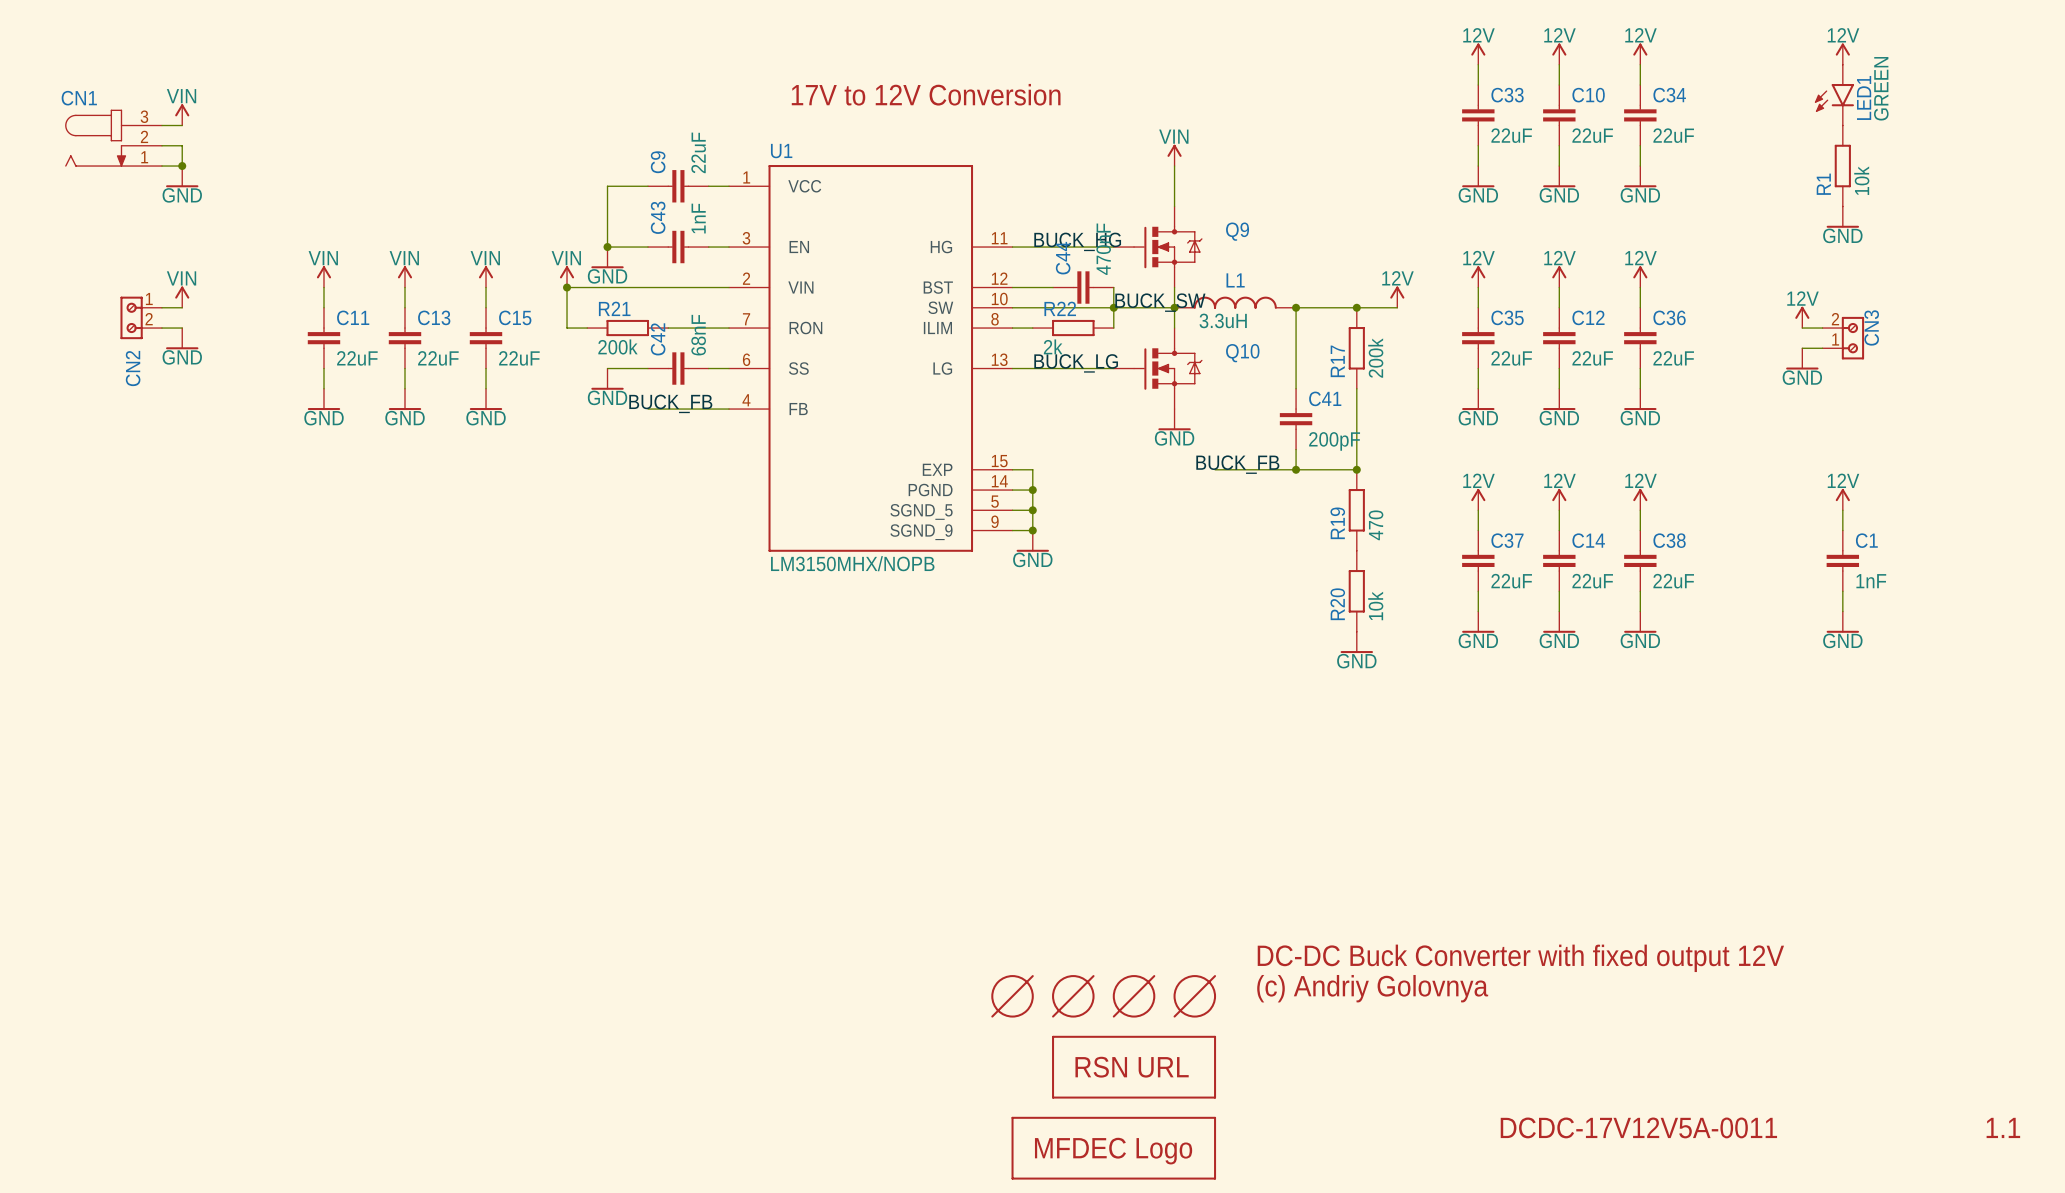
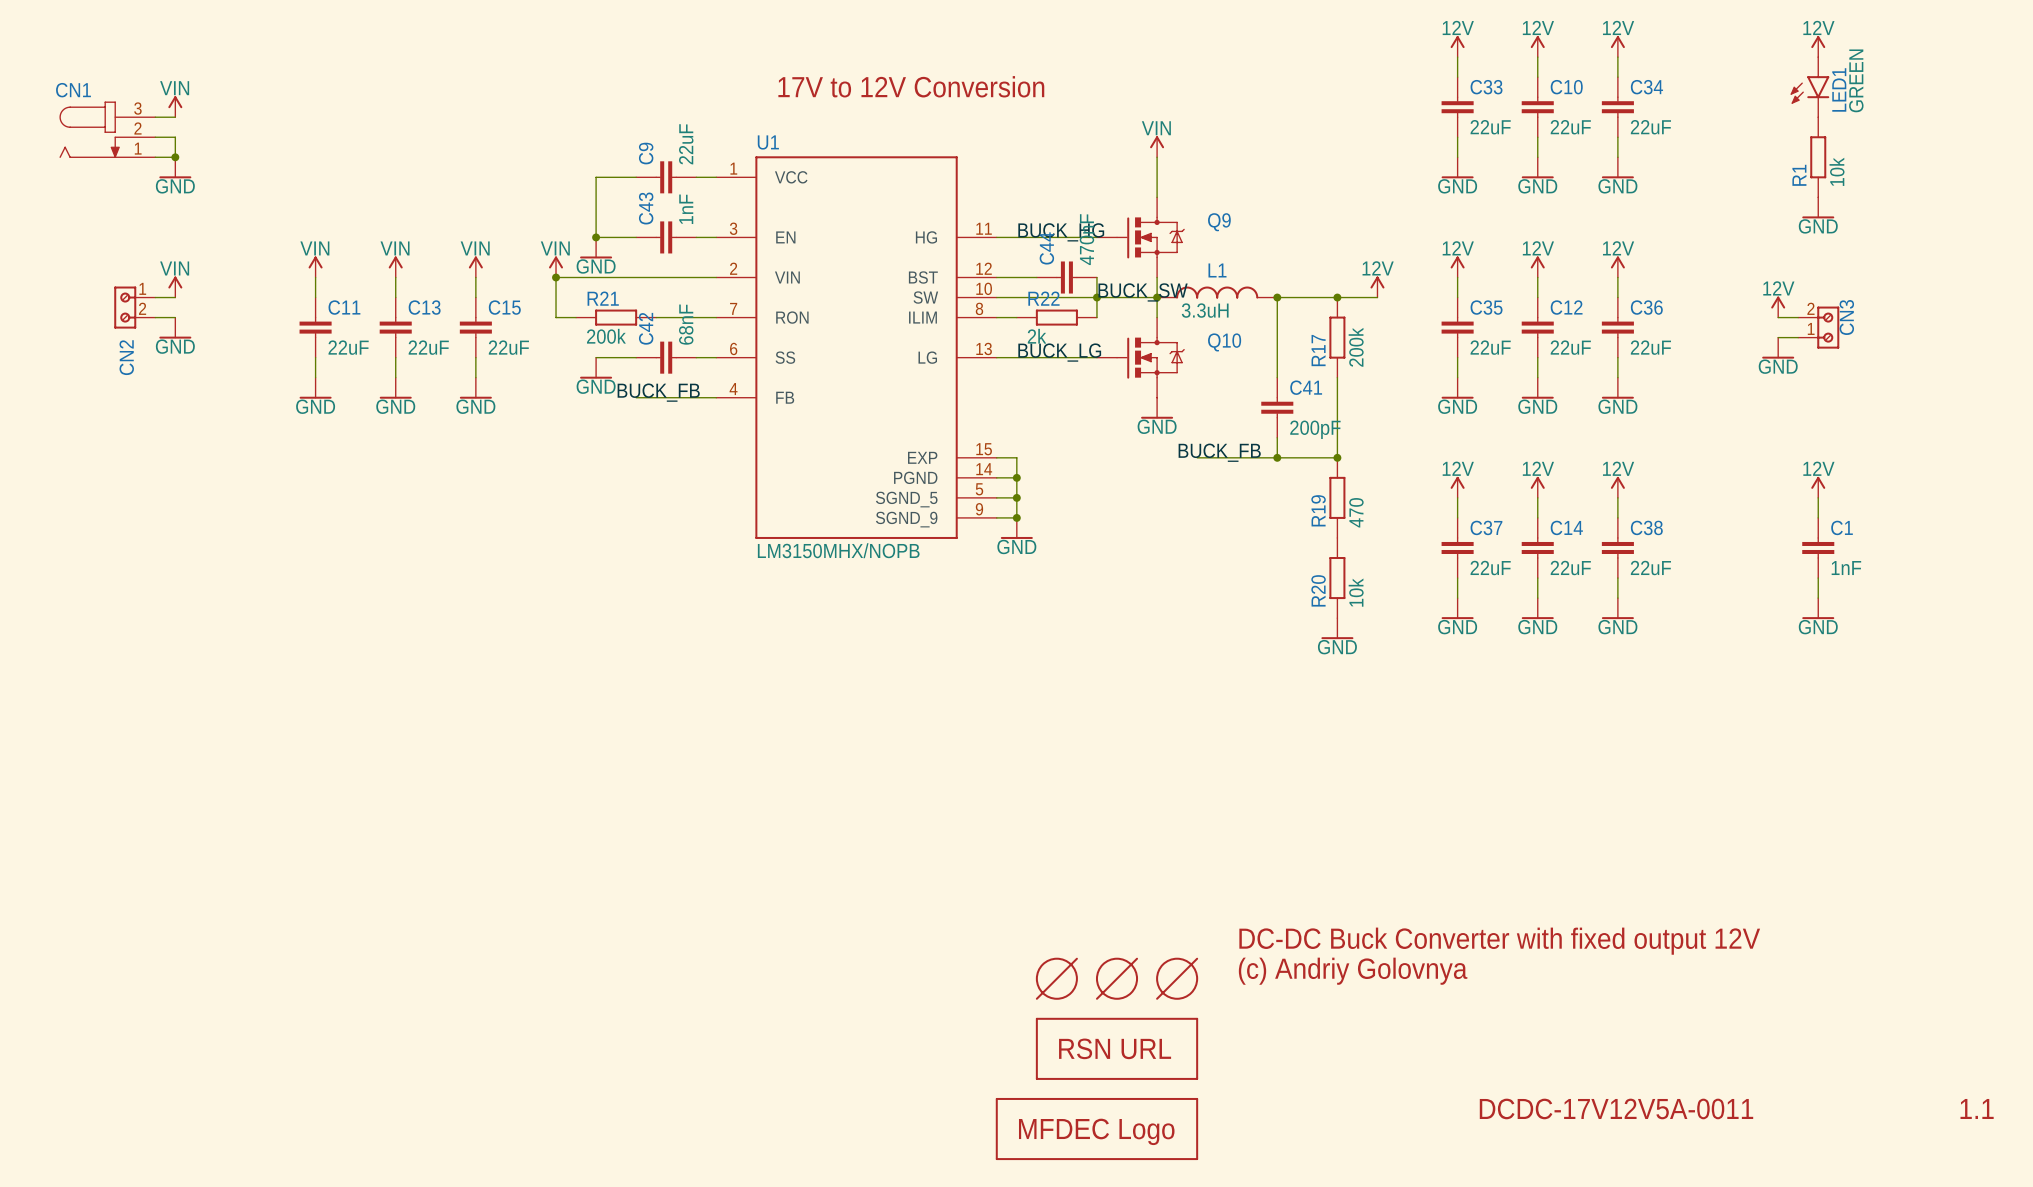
part: (1012, 996) -> none

